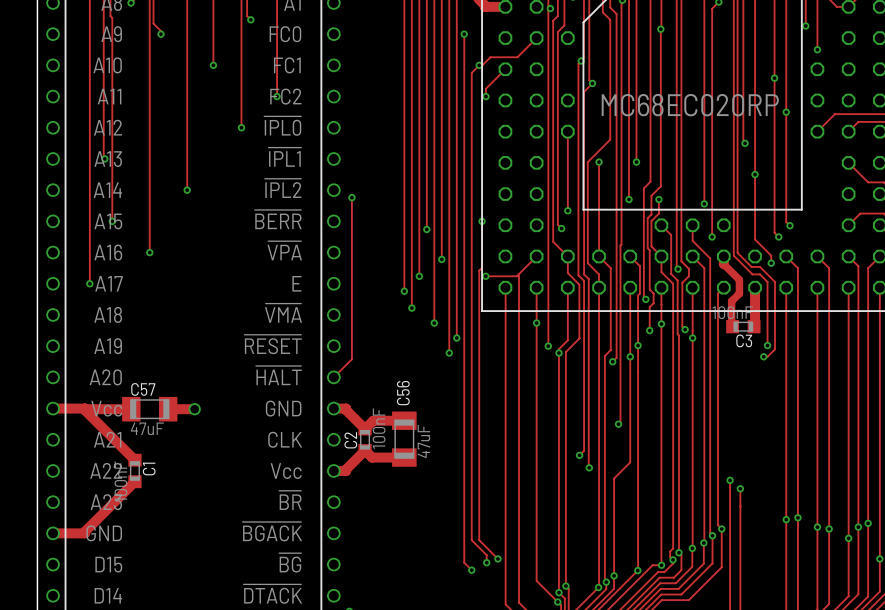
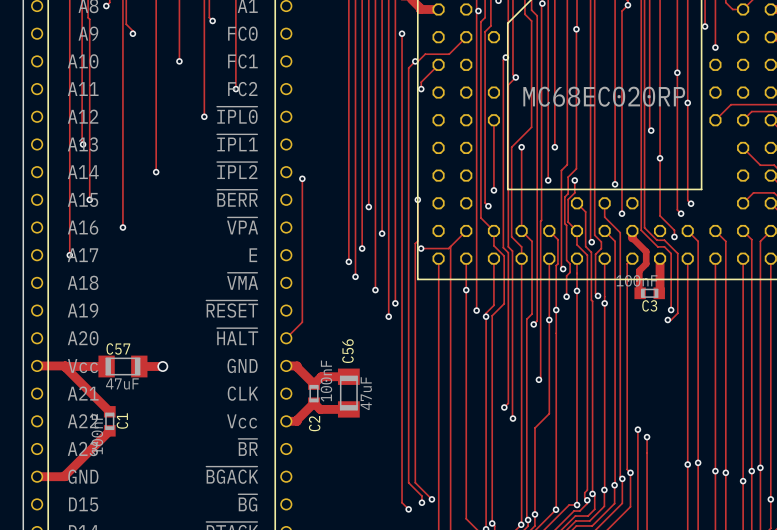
C2 name position: C2 (350, 440) -> C2 (314, 423)

